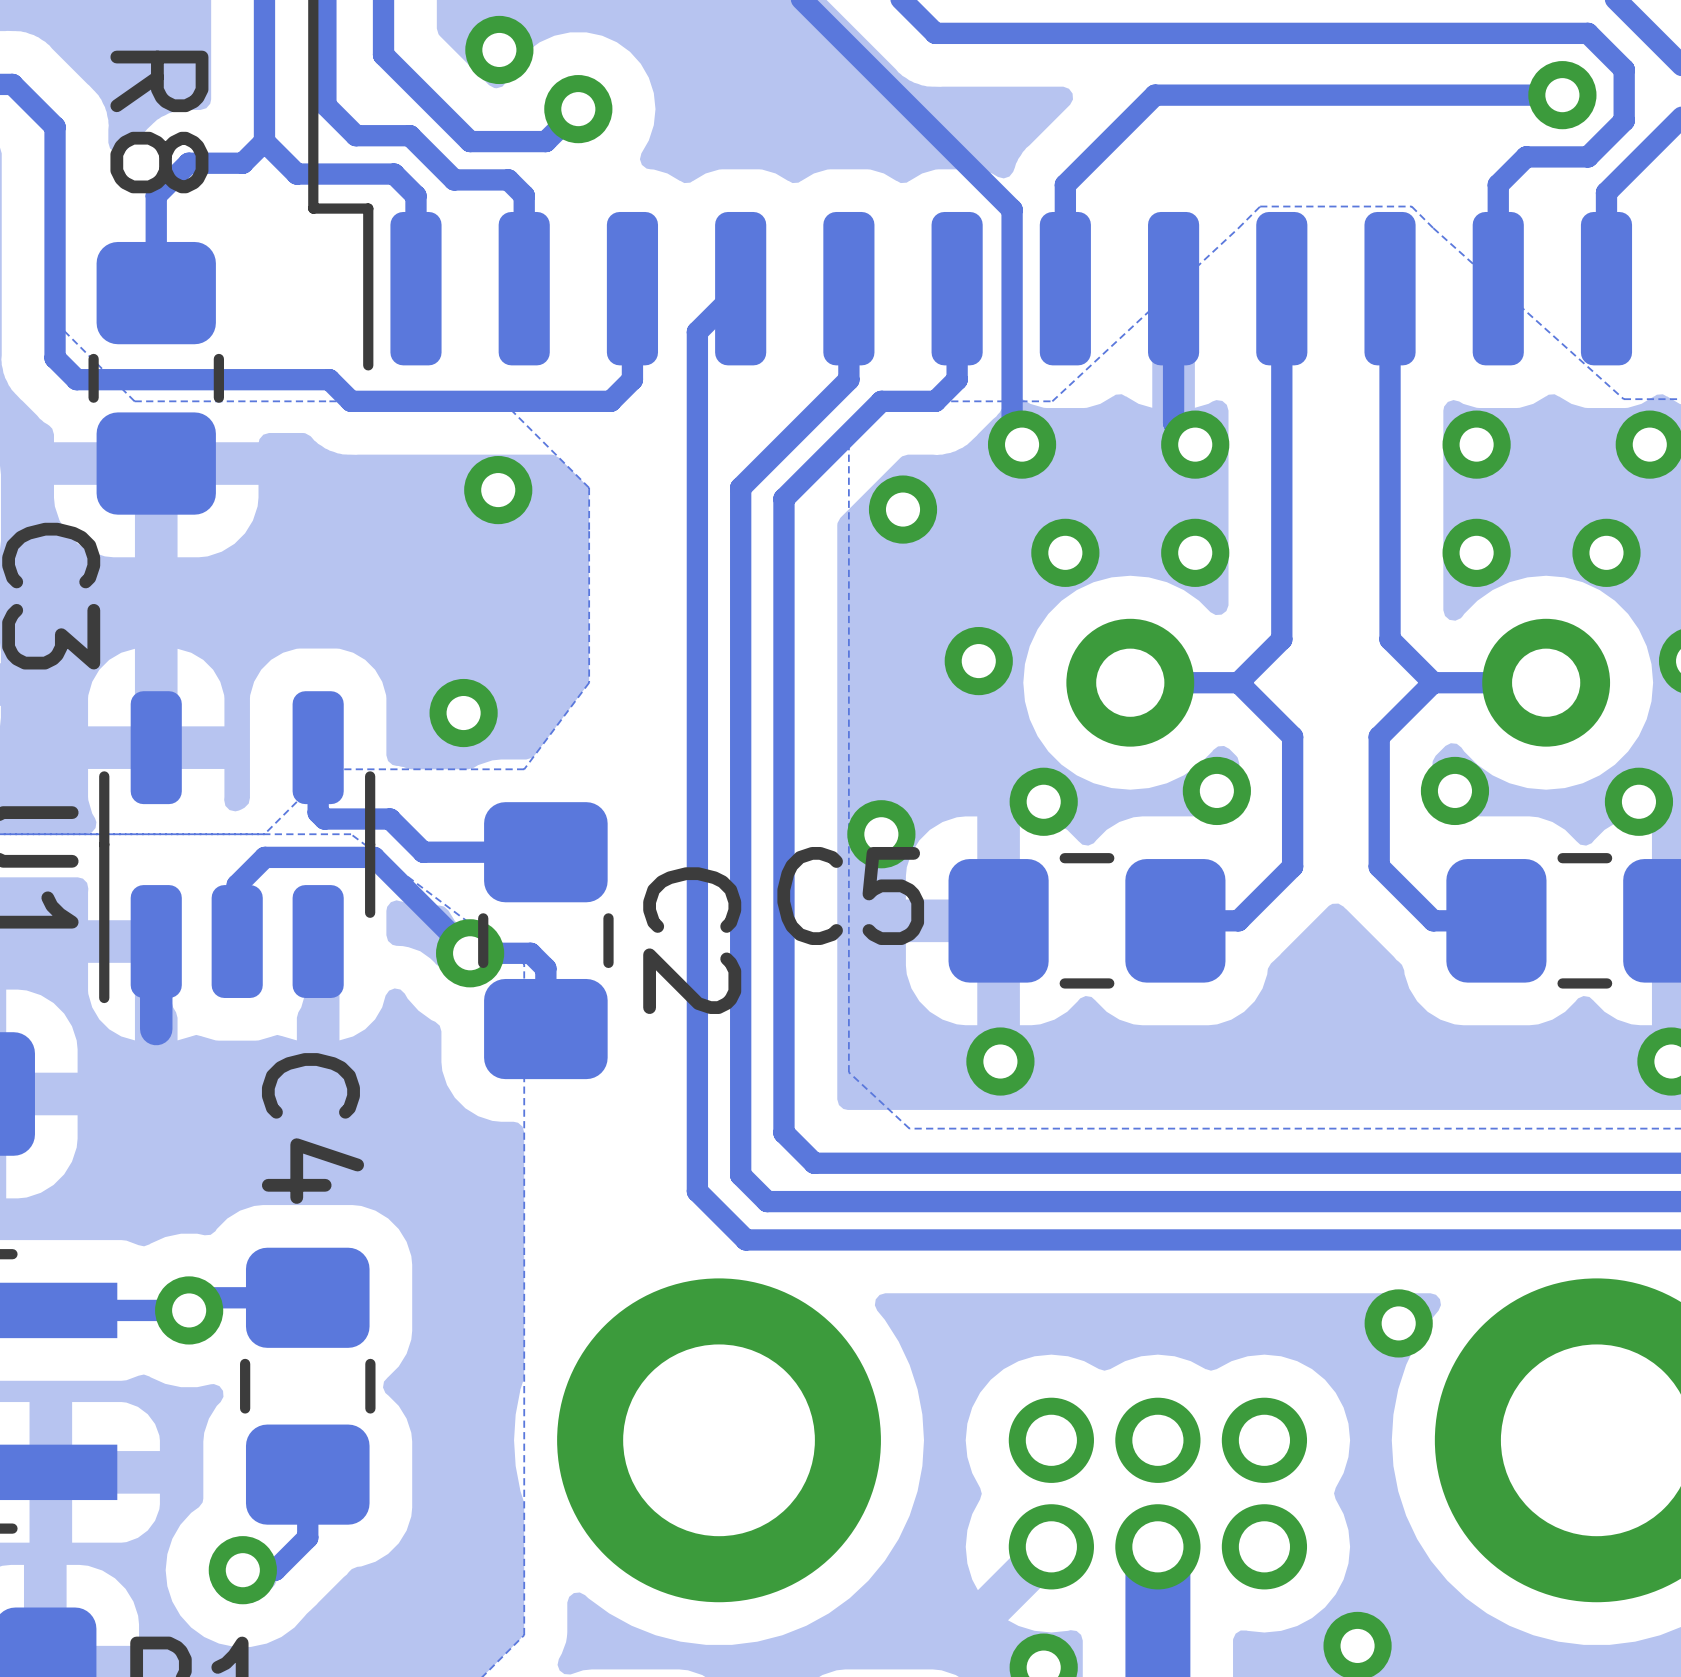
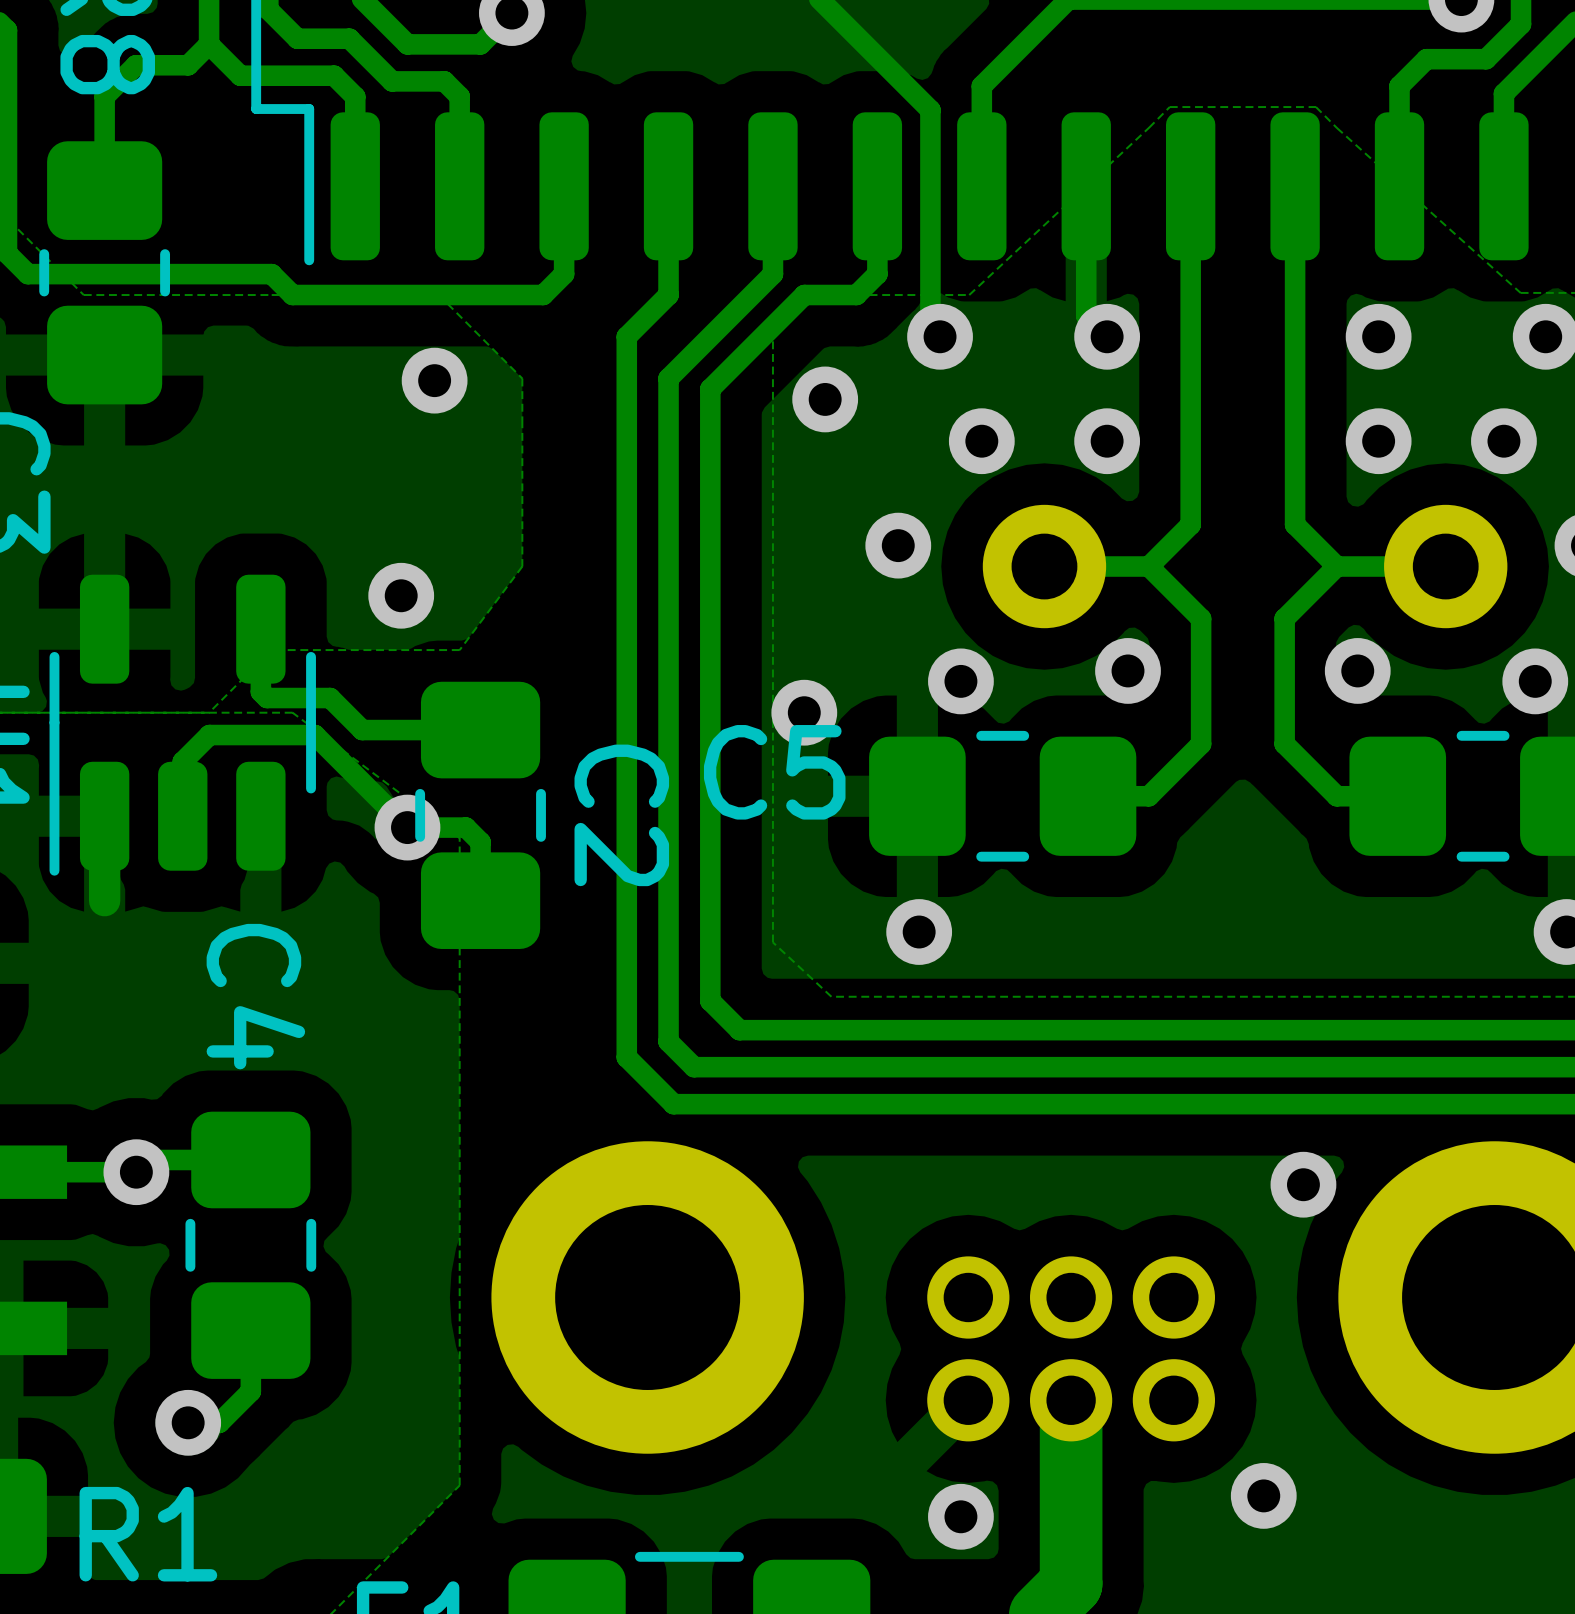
track: (740, 288) (697, 331) (697, 444) -> (668, 186) (668, 295) (626, 336)

